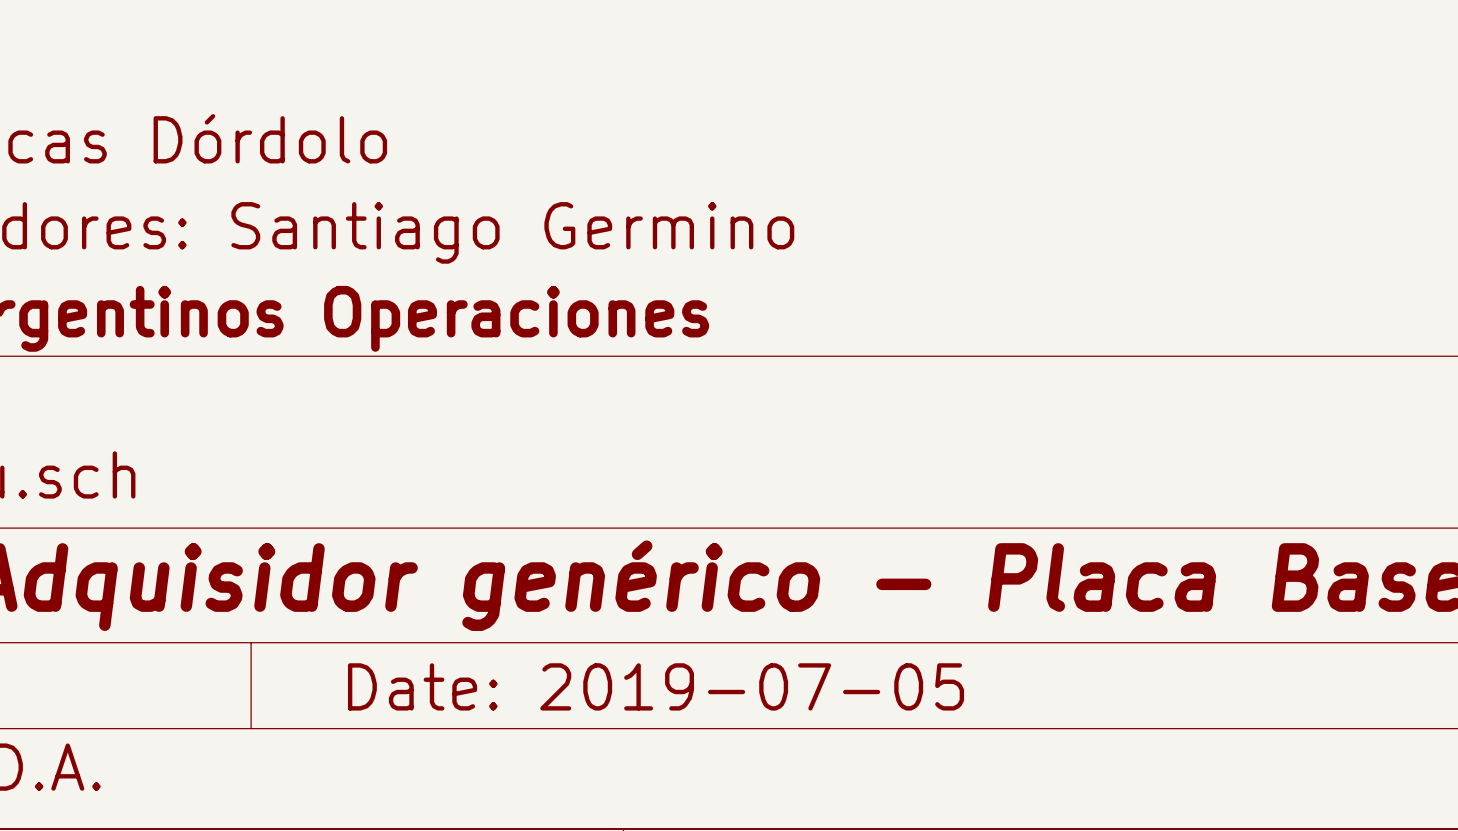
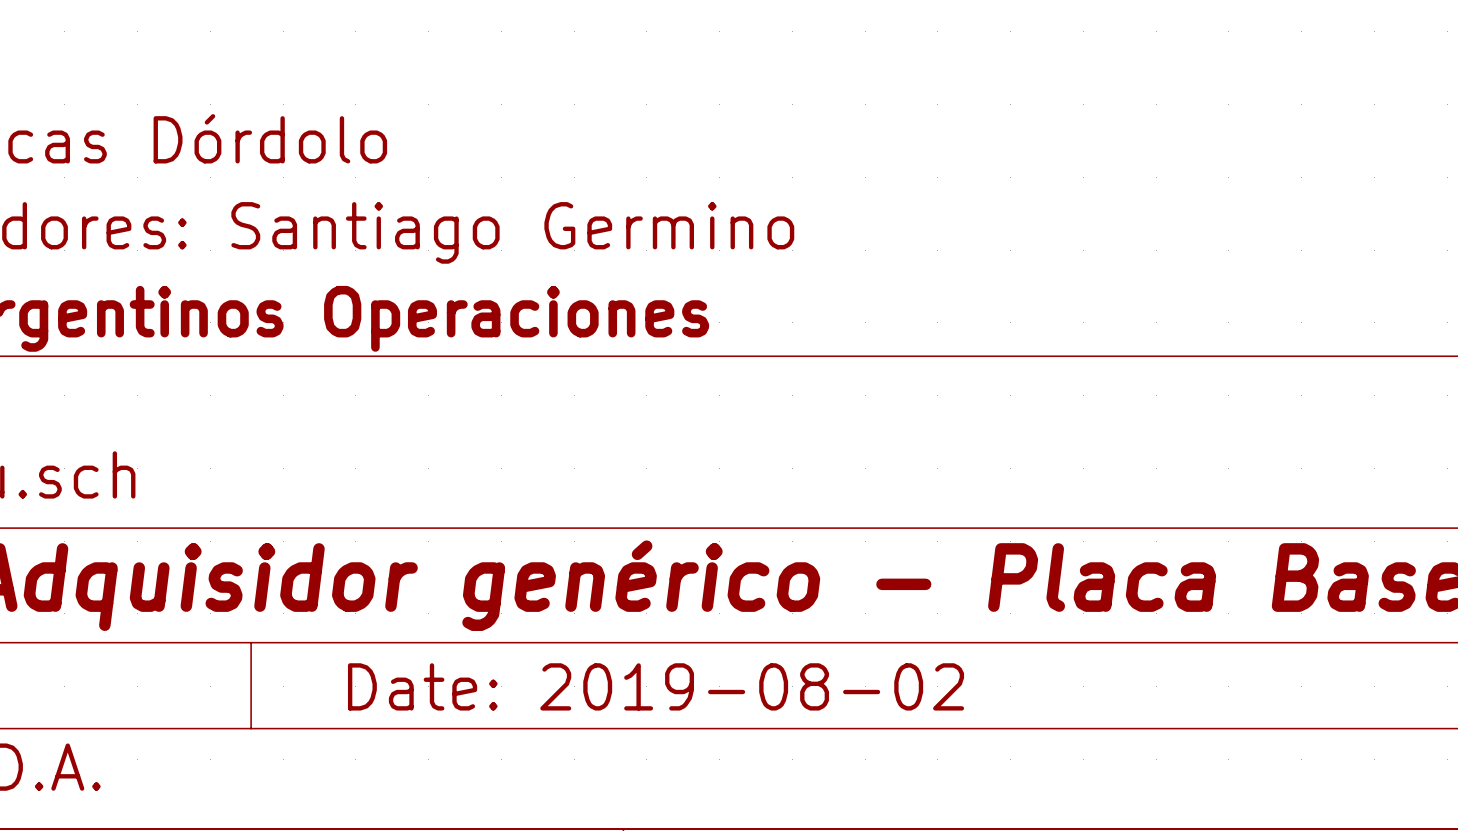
title block: Date: 2019-07-05 (656, 686) -> Date: 2019-08-02 (656, 686)

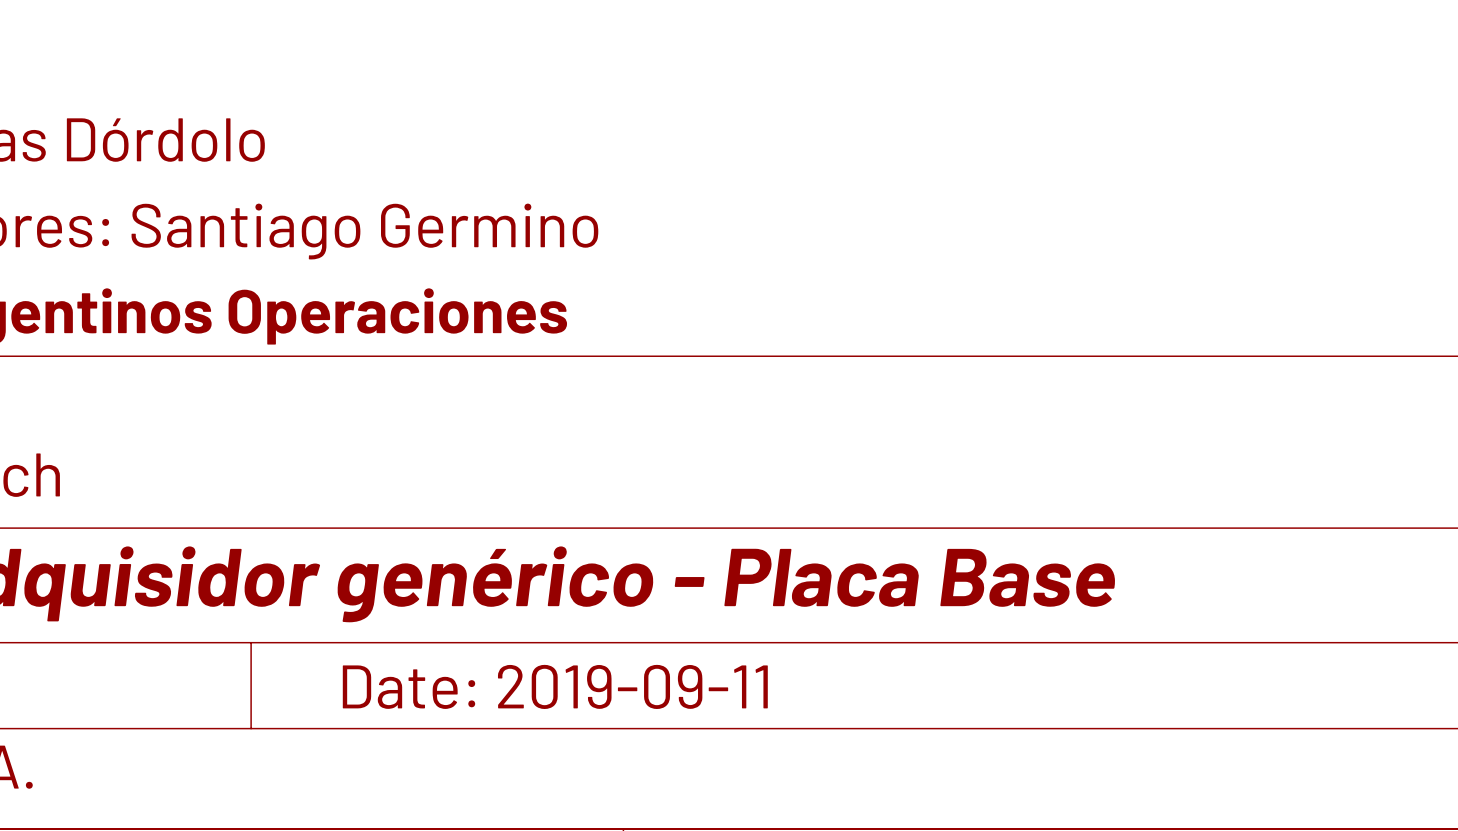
title block: Date: 2019-08-02 (656, 686) -> Date: 2019-09-11 (555, 686)

